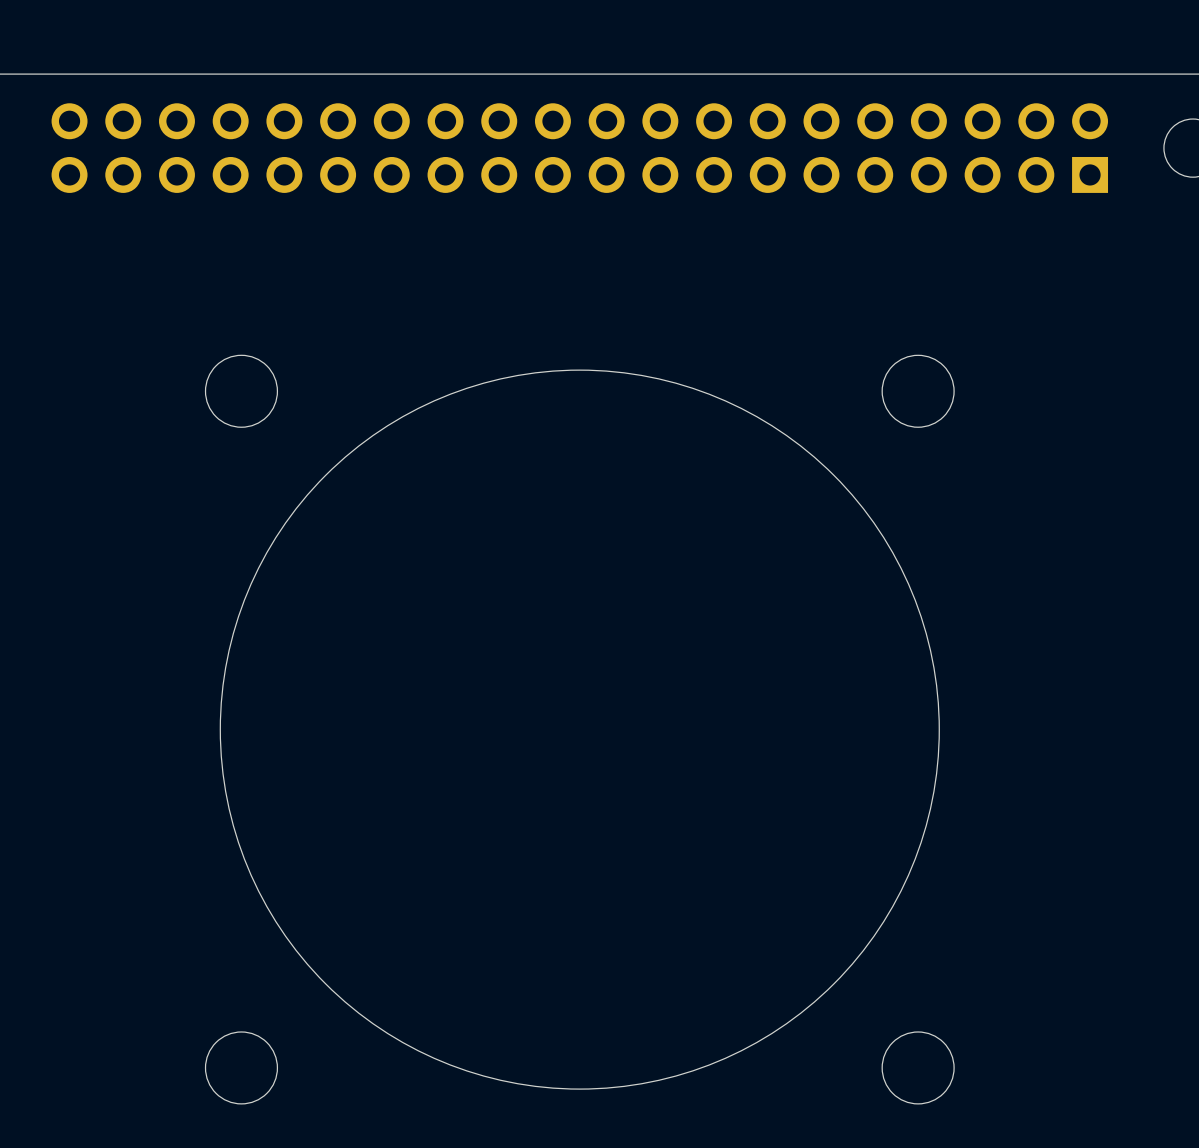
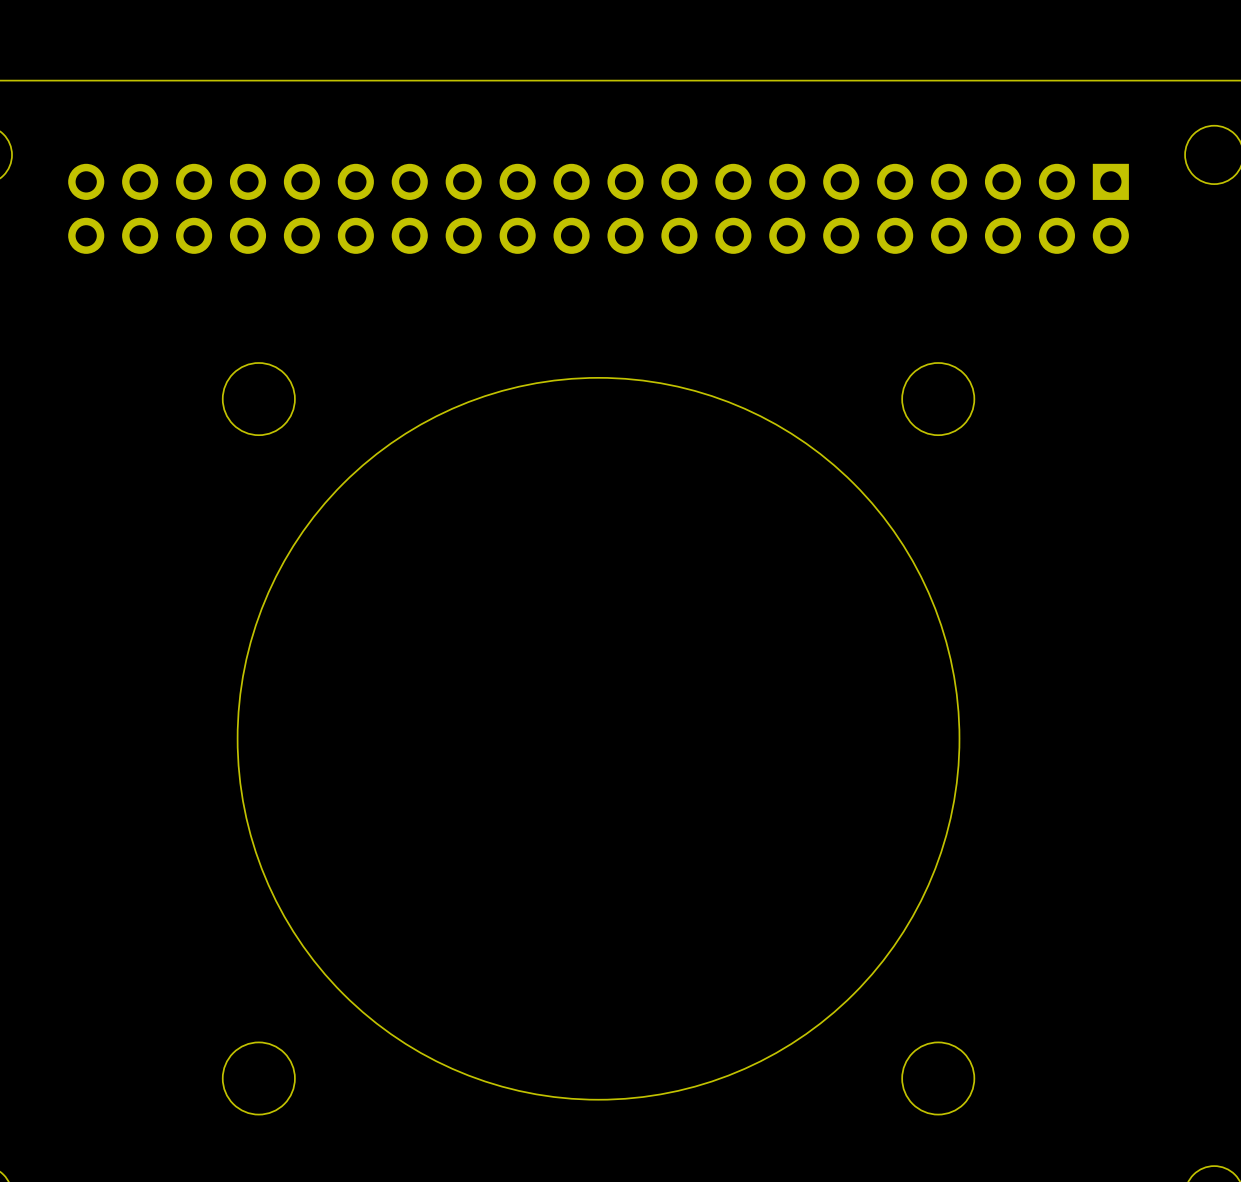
part: (579, 148) -> none
part: none -> (598, 208)

